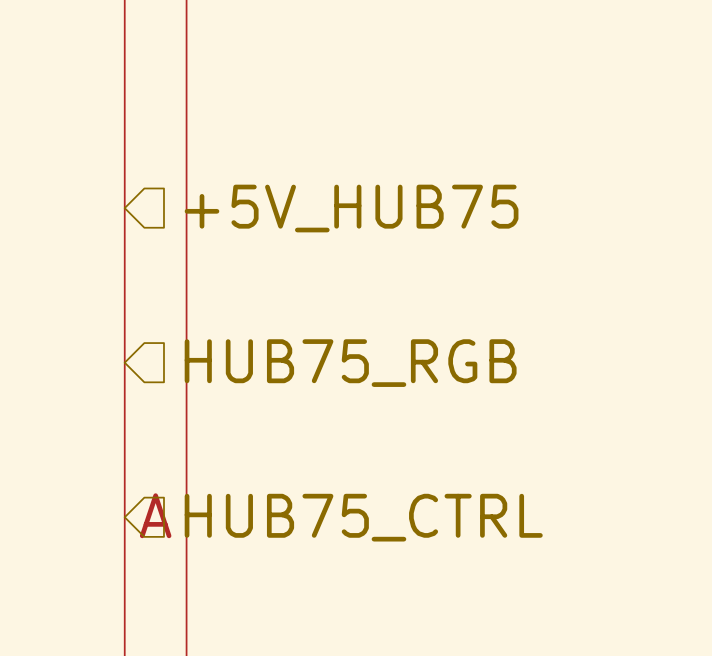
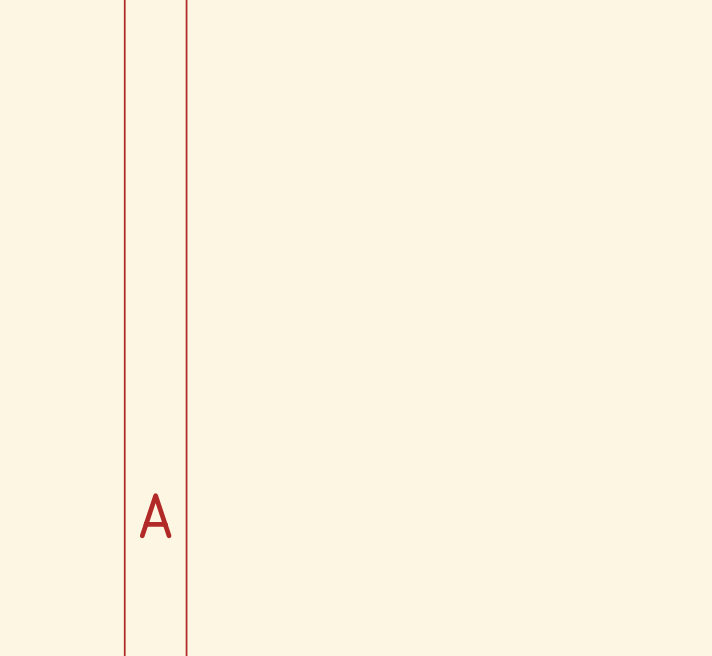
hierarchical label: +5V_HUB75 (351, 208) -> none
hierarchical label: HUB75_RGB (350, 363) -> none
hierarchical label: HUB75_CTRL (363, 517) -> none

